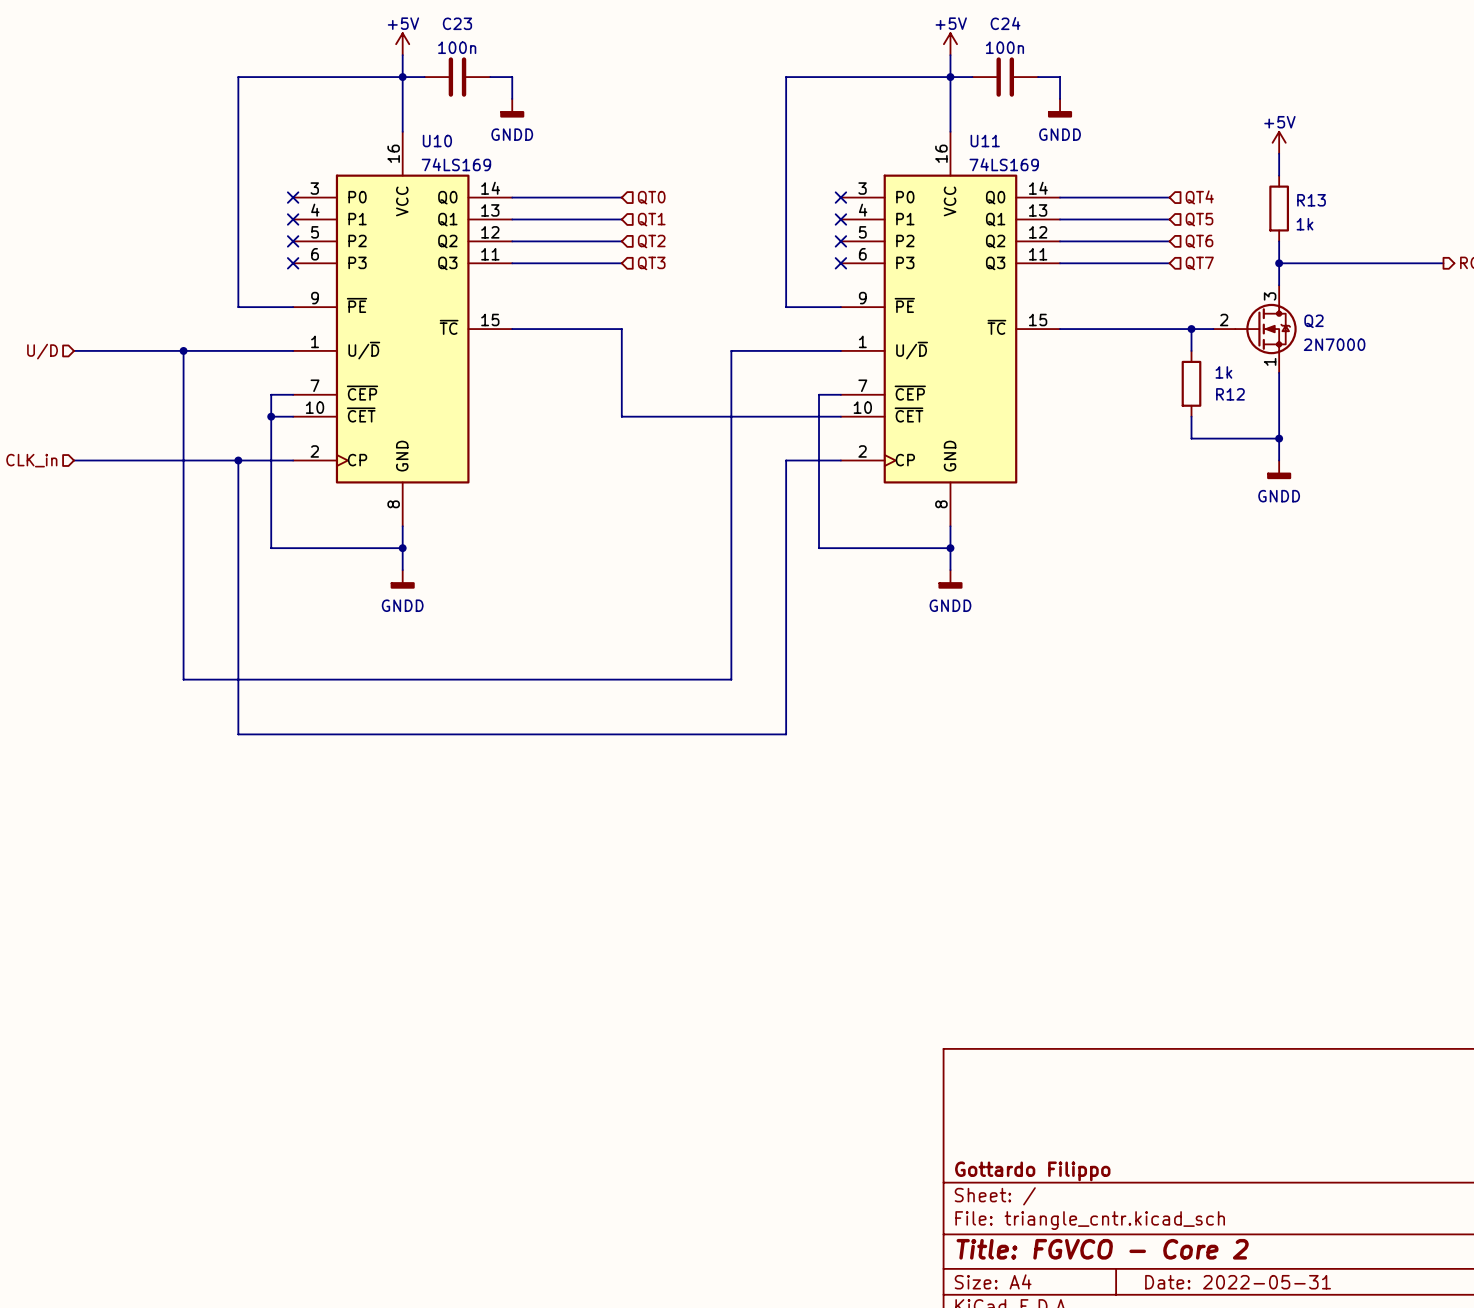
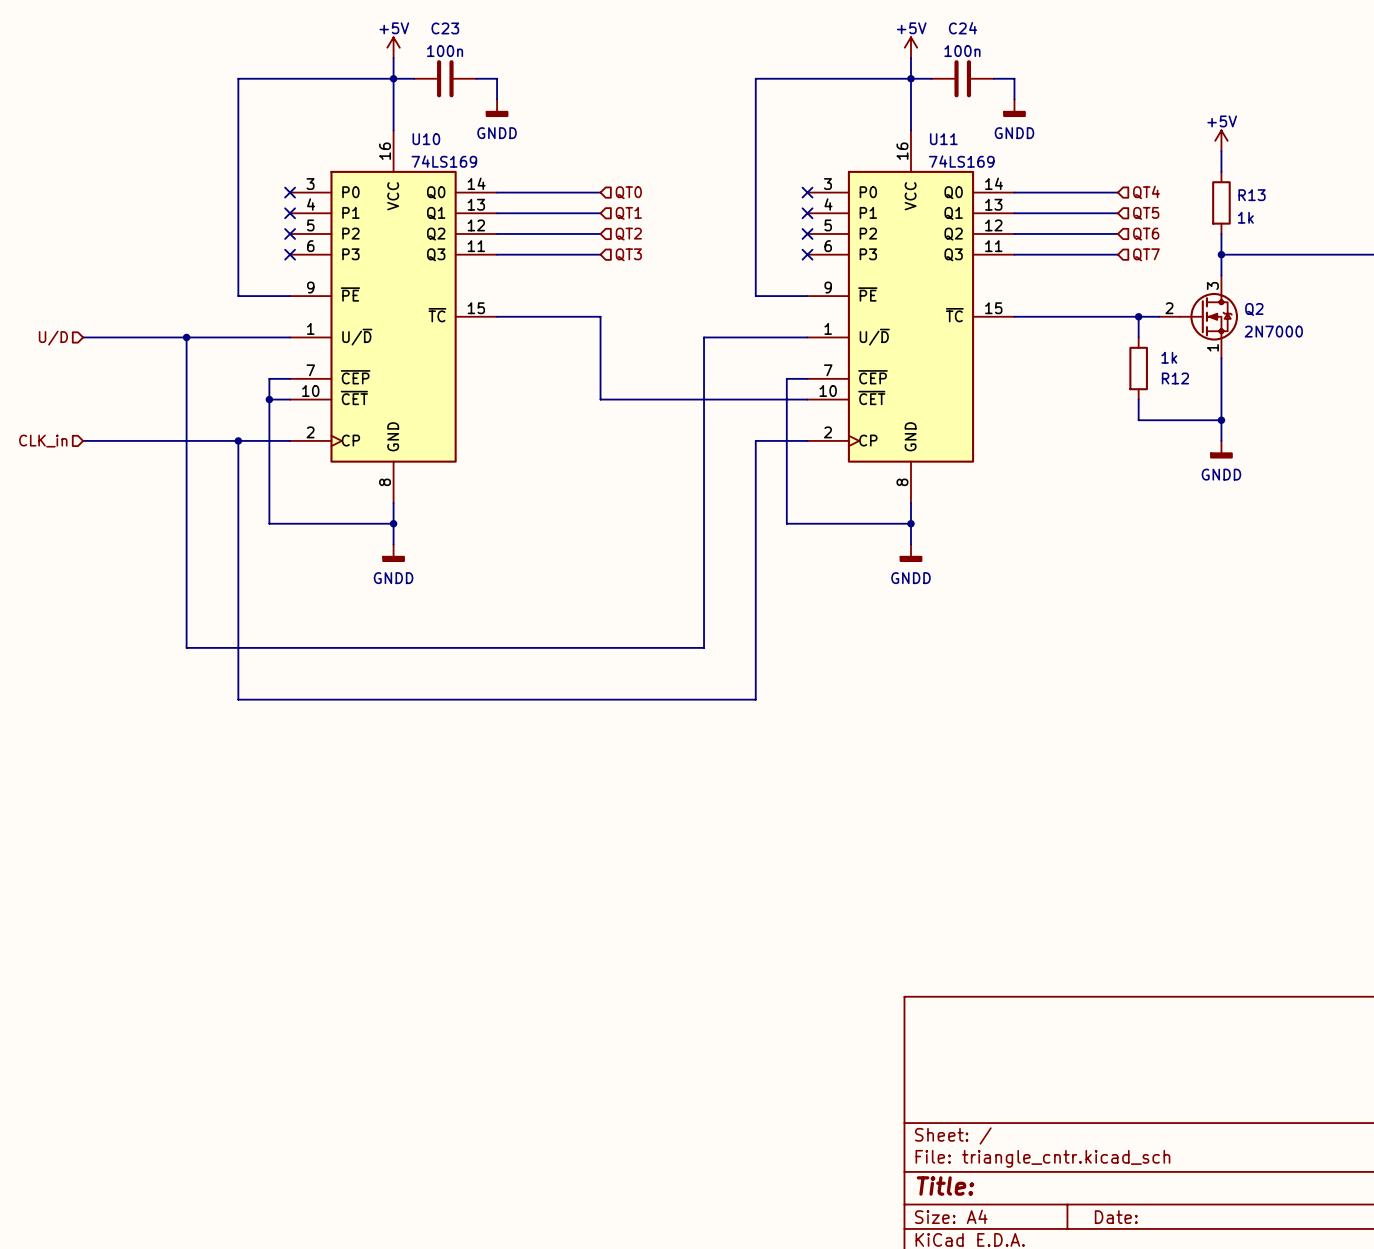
title block: Gottardo Filippo (1032, 1171) -> none
title block: Title: FGVCO - Core 2 (1102, 1249) -> Title: (945, 1185)
title block: Date: 2022-05-31 (1238, 1282) -> Date: (1116, 1217)

